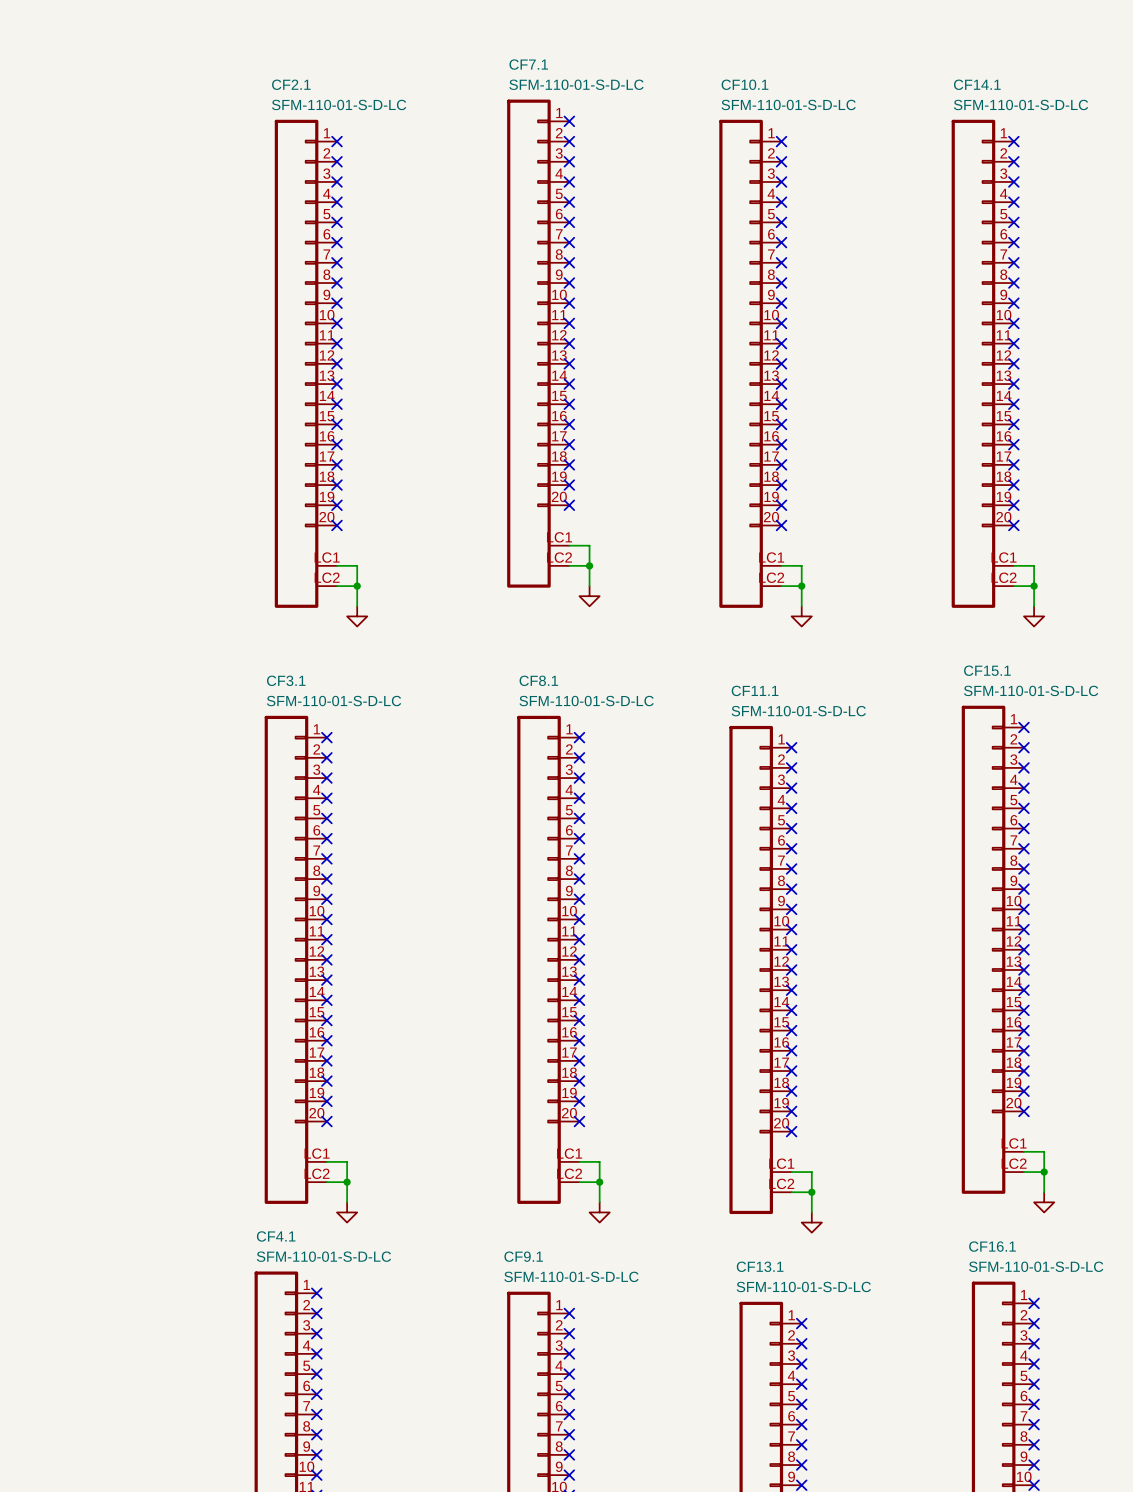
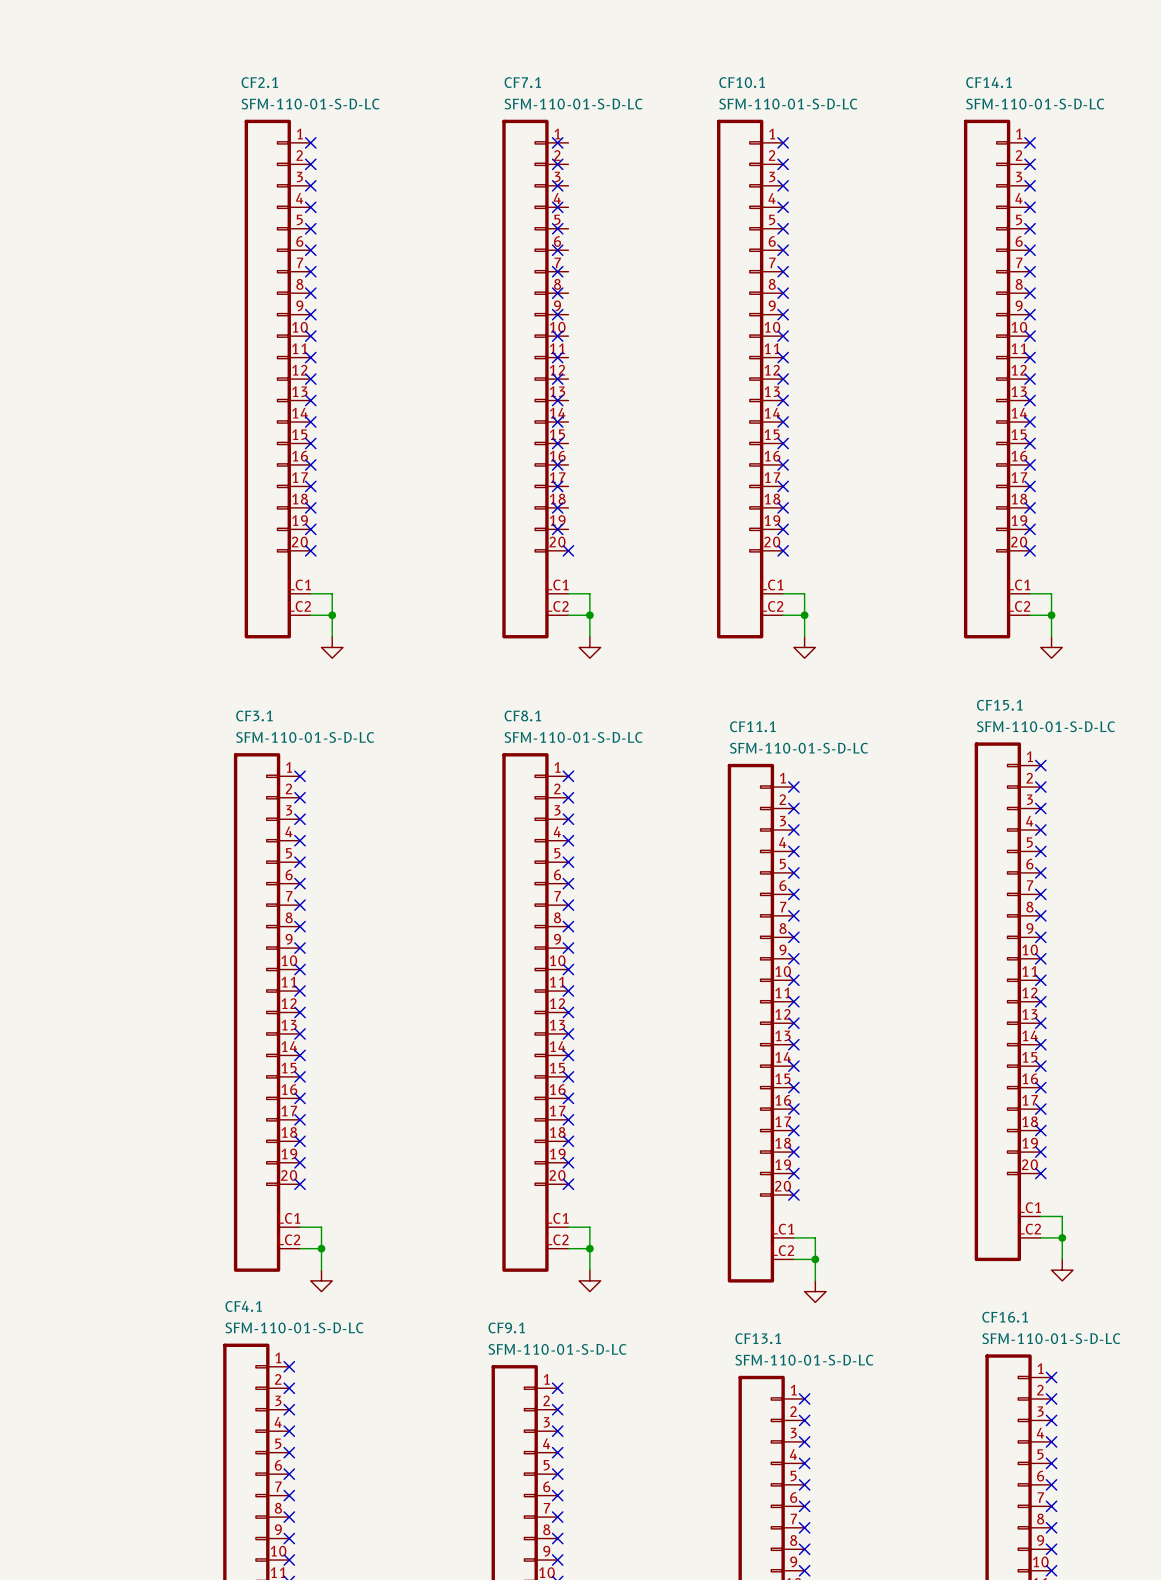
no-connect mark: (569, 121) -> none
CF7.1 position: (538, 343) -> (535, 379)
no-connect mark: none -> (568, 550)
wire: (569, 545) (589, 545) (589, 586) -> none
wire: none -> (579, 593) (589, 593) (589, 636)
junction position: (589, 565) -> (589, 615)
wire: none -> (568, 615) (589, 615)
power symbol position: (589, 596) -> (589, 647)

